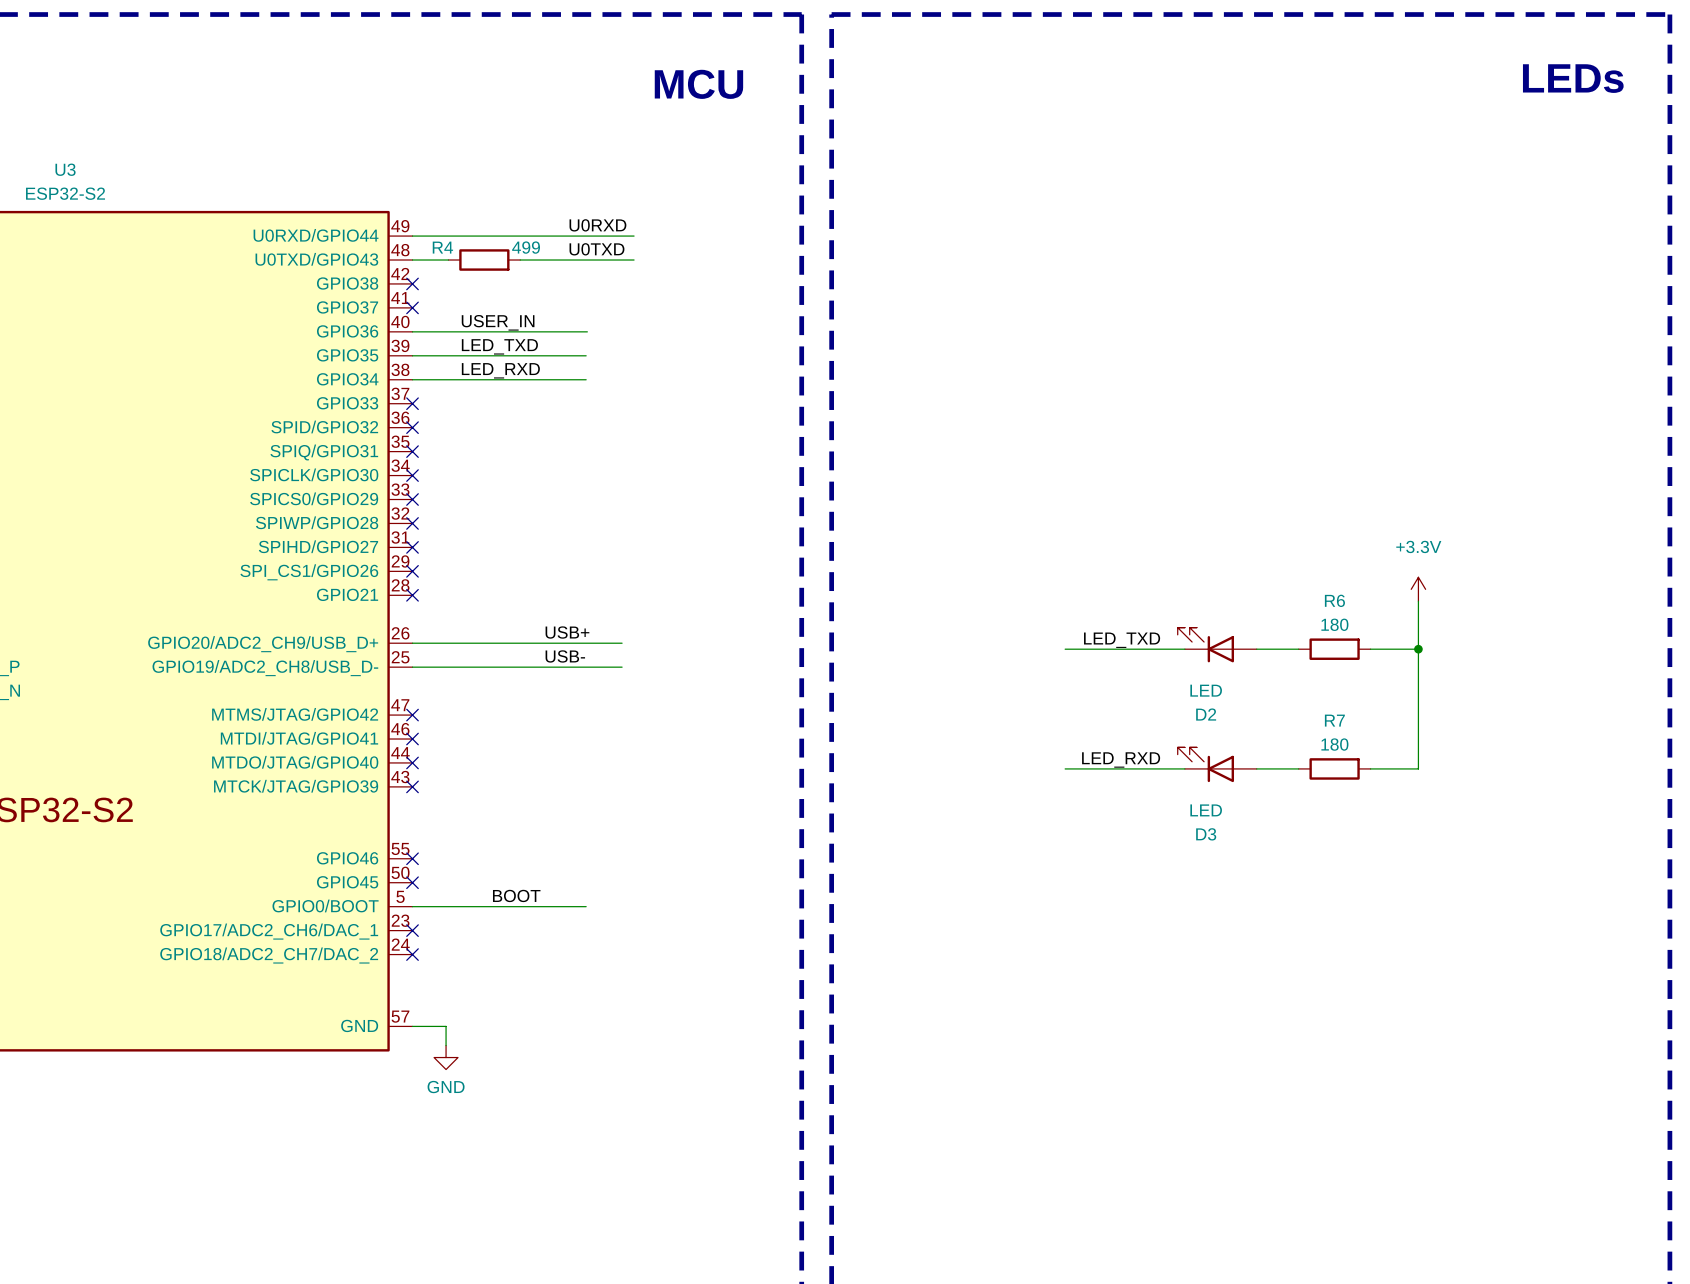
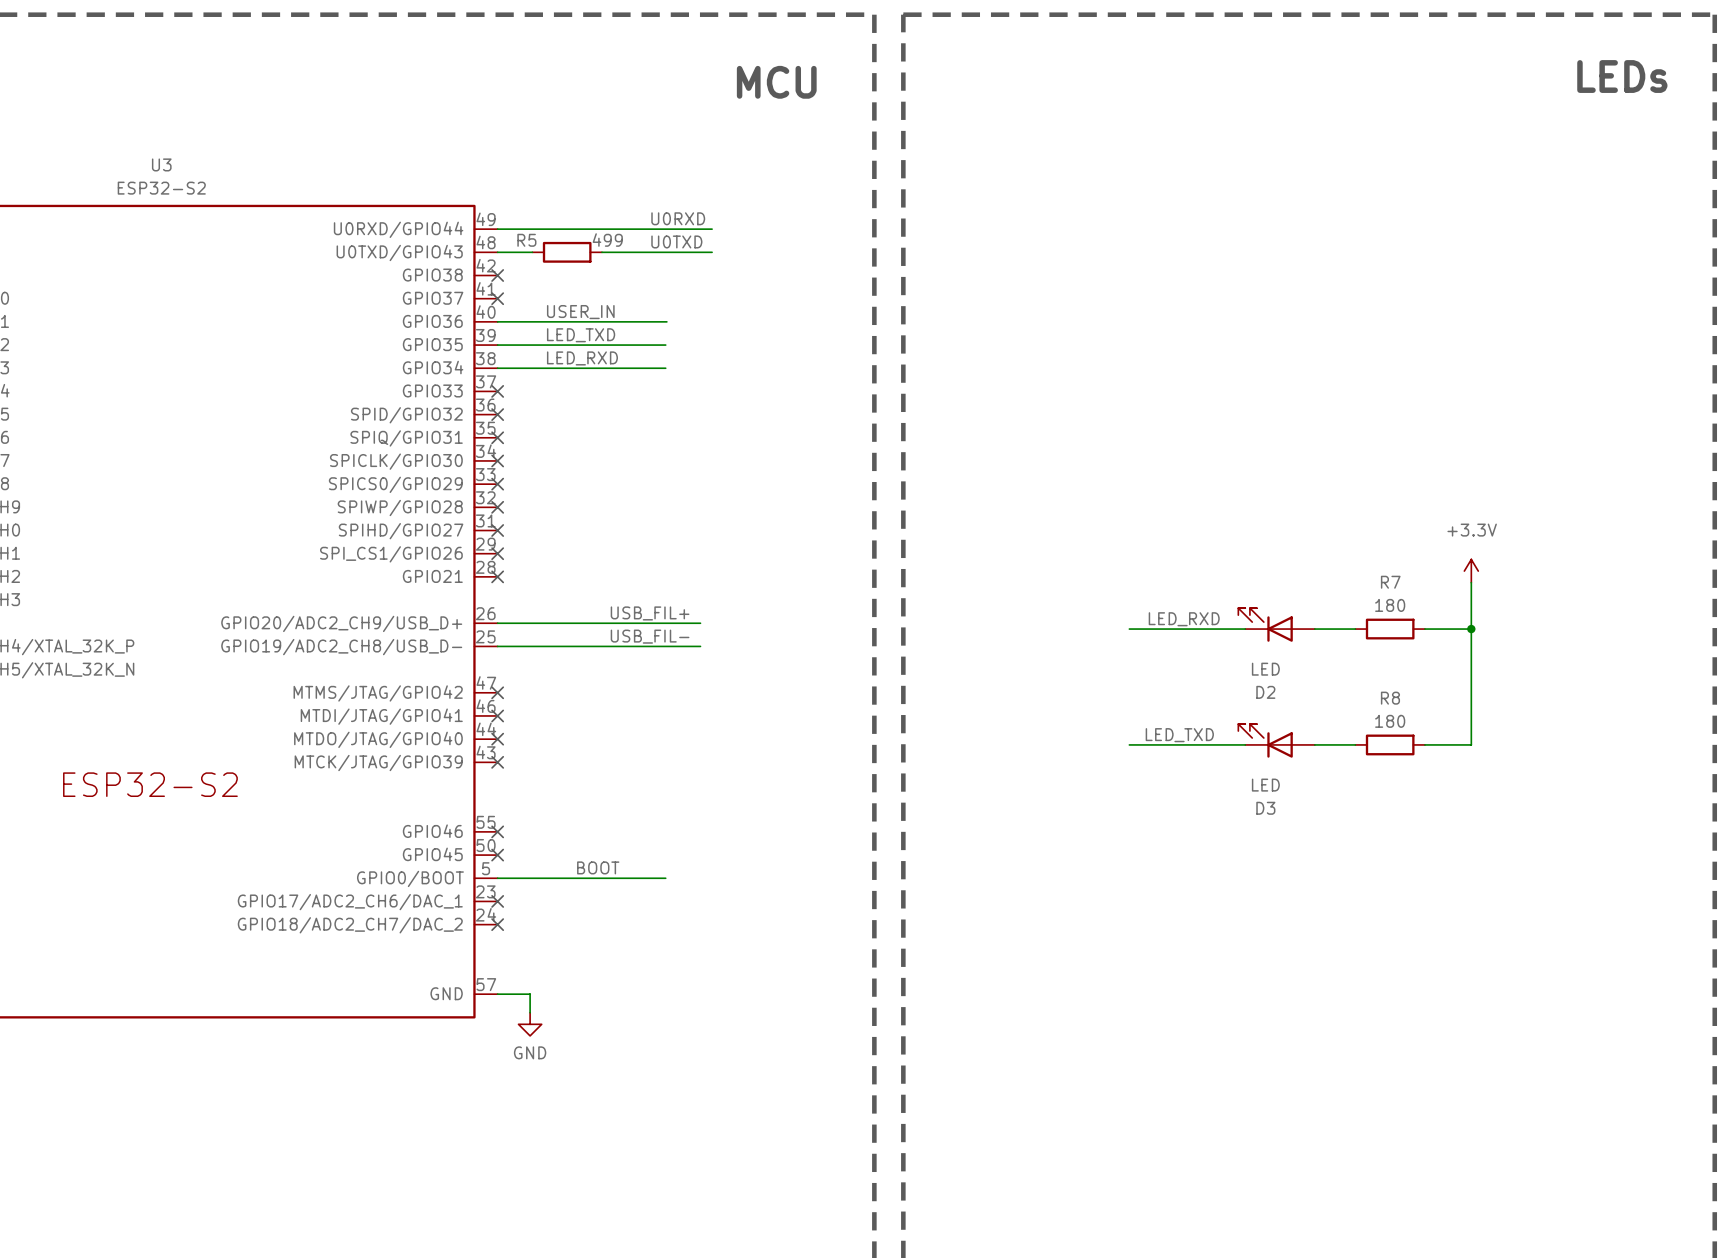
R4 name: R4 (442, 247) -> R5 (526, 240)
R6 name: R6 (1334, 600) -> R7 (1390, 582)
label: USB+ (567, 632) -> USB_FIL+ (650, 613)
label: LED_TXD (1122, 640) -> LED_RXD (1184, 619)
label: USB- (565, 656) -> USB_FIL- (650, 636)
R7 name: R7 (1334, 720) -> R8 (1390, 698)
label: LED_RXD (1121, 759) -> LED_TXD (1179, 735)

